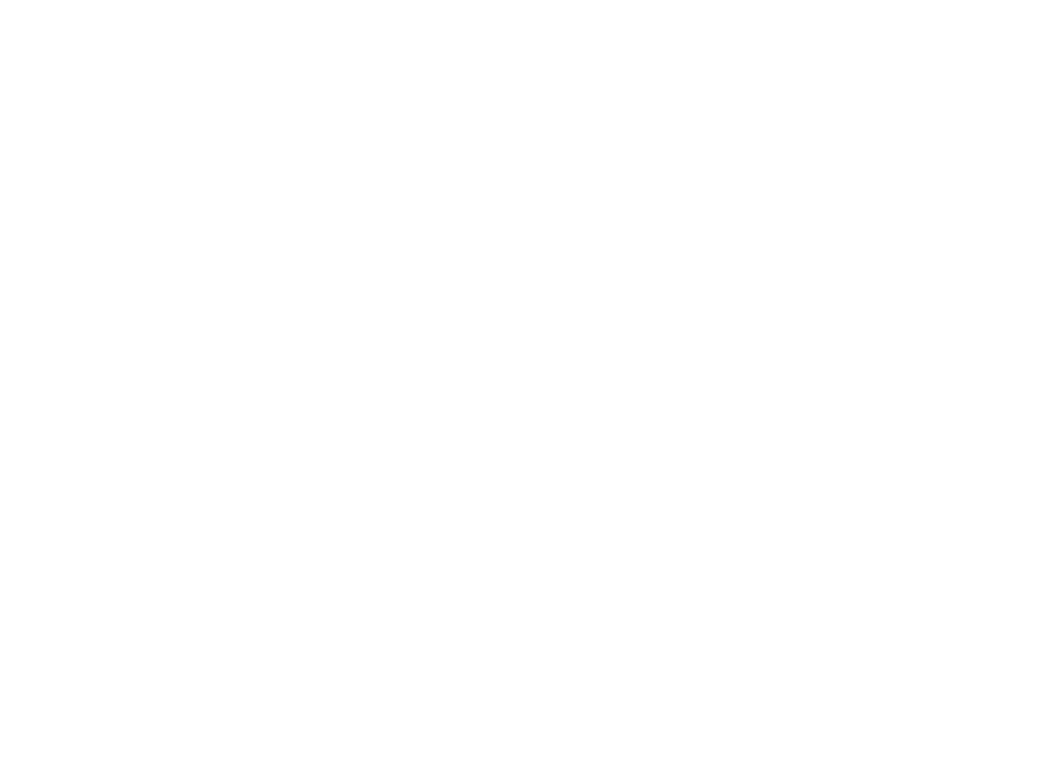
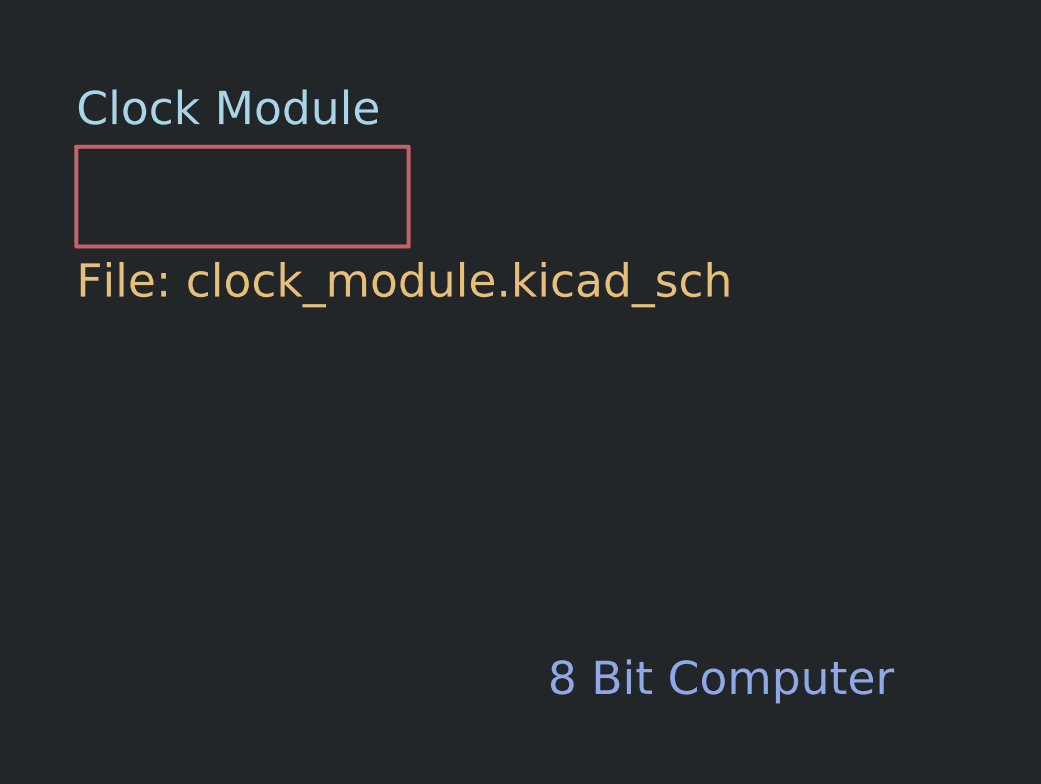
sheet Clock Module: none -> File: clock_module.kicad_sch (242, 196)
text: none -> 8 Bit Computer (722, 681)

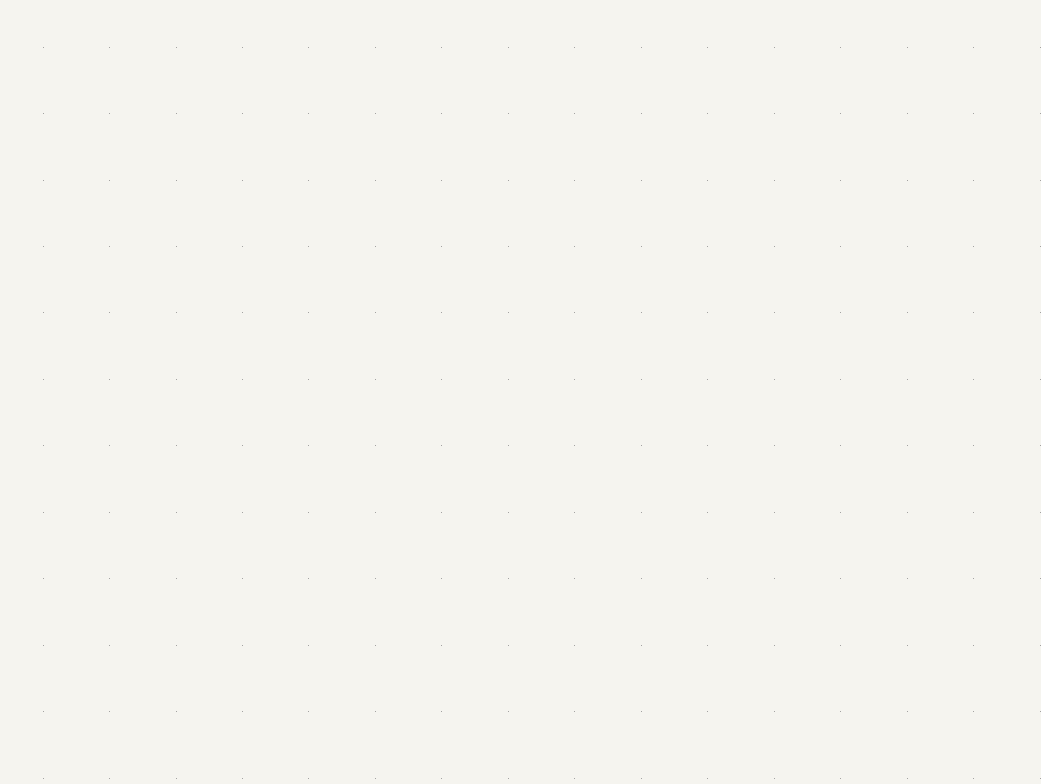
sheet Clock Module: File: clock_module.kicad_sch (242, 196) -> none
text: 8 Bit Computer (722, 681) -> none

